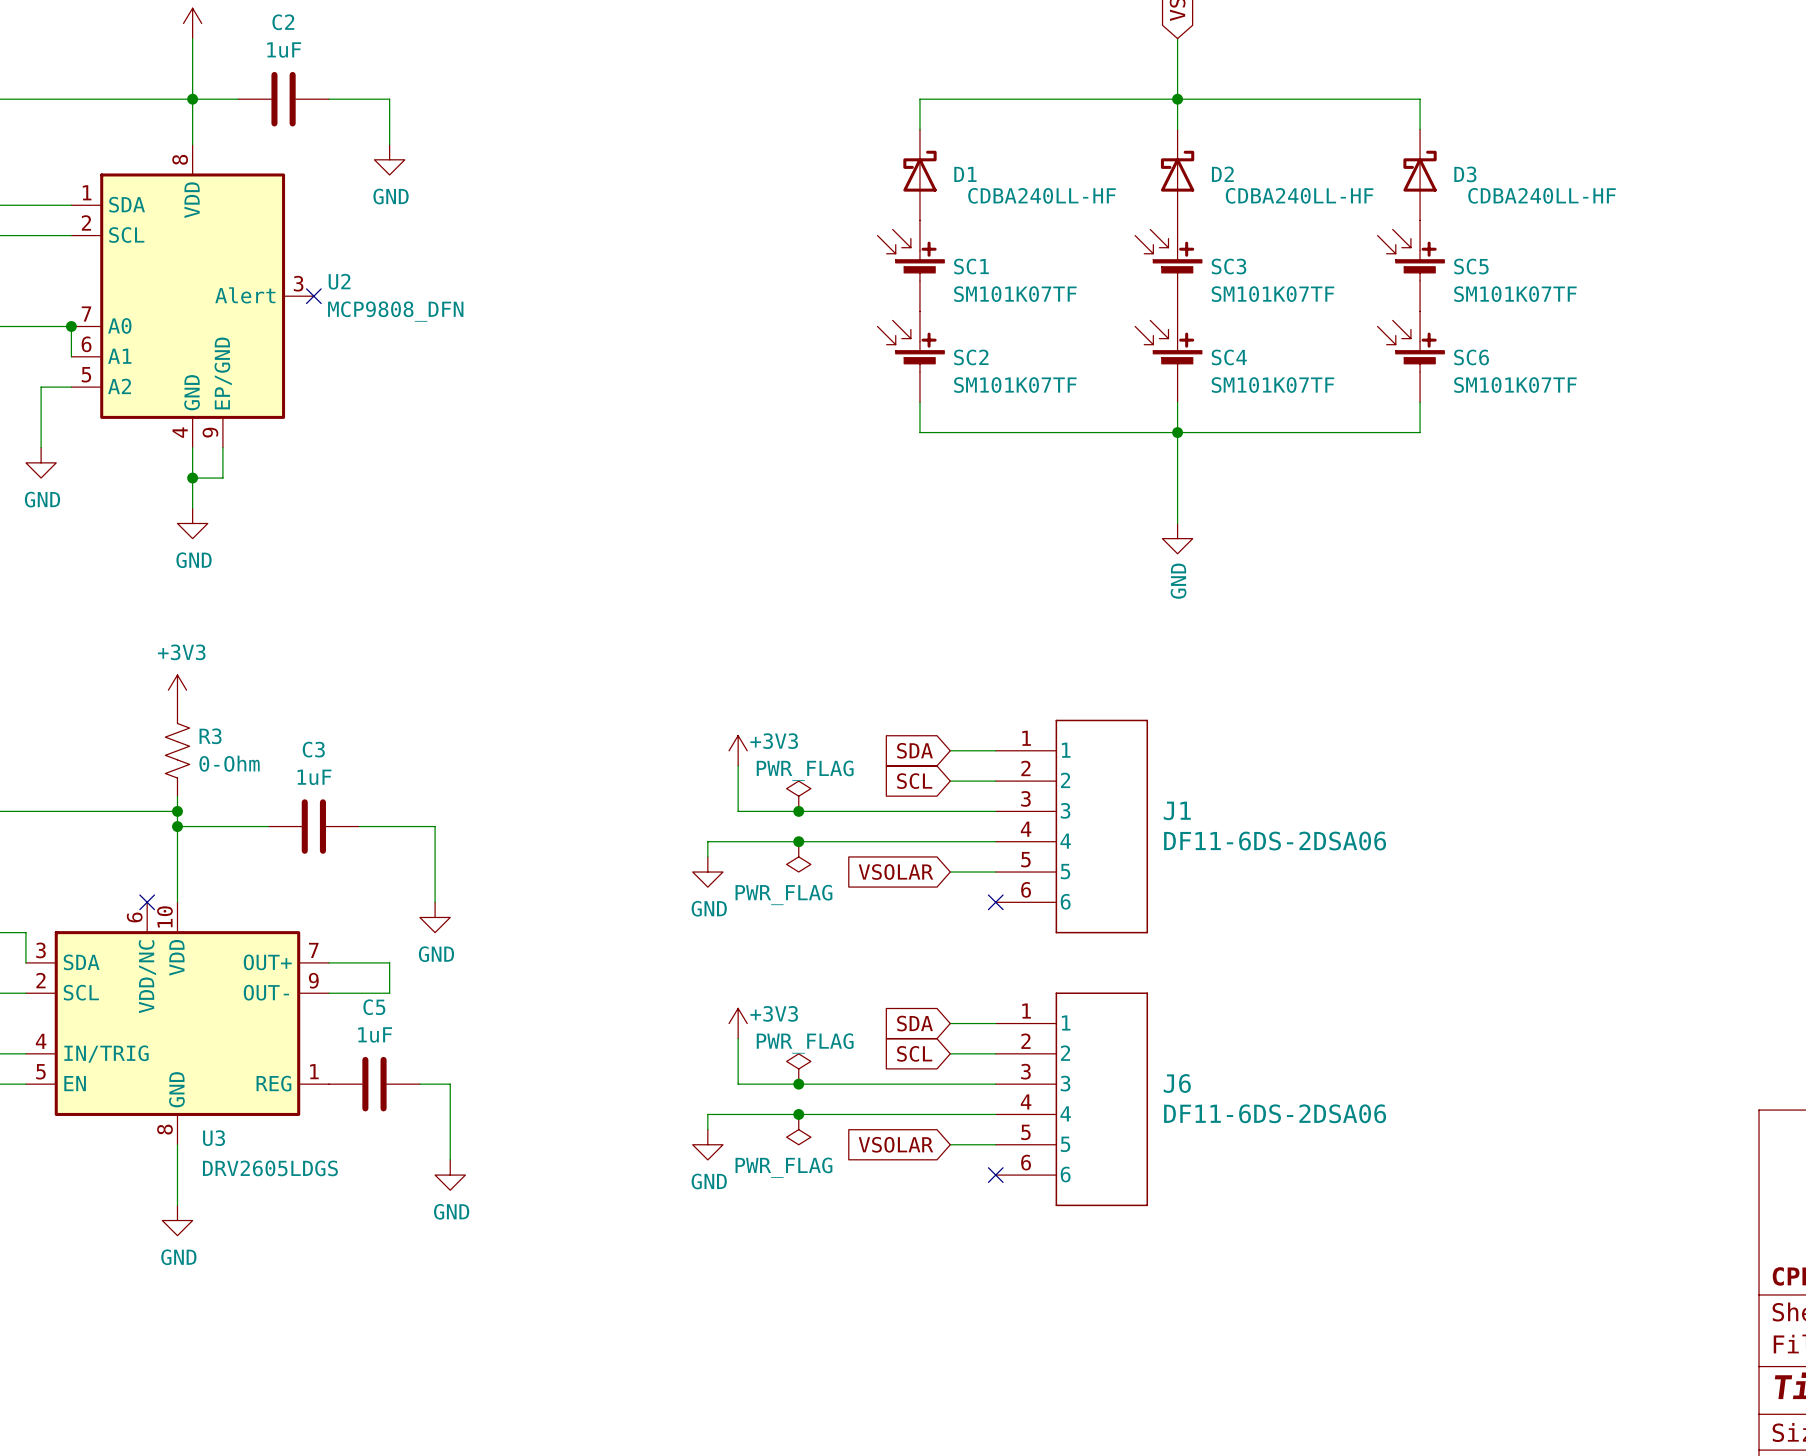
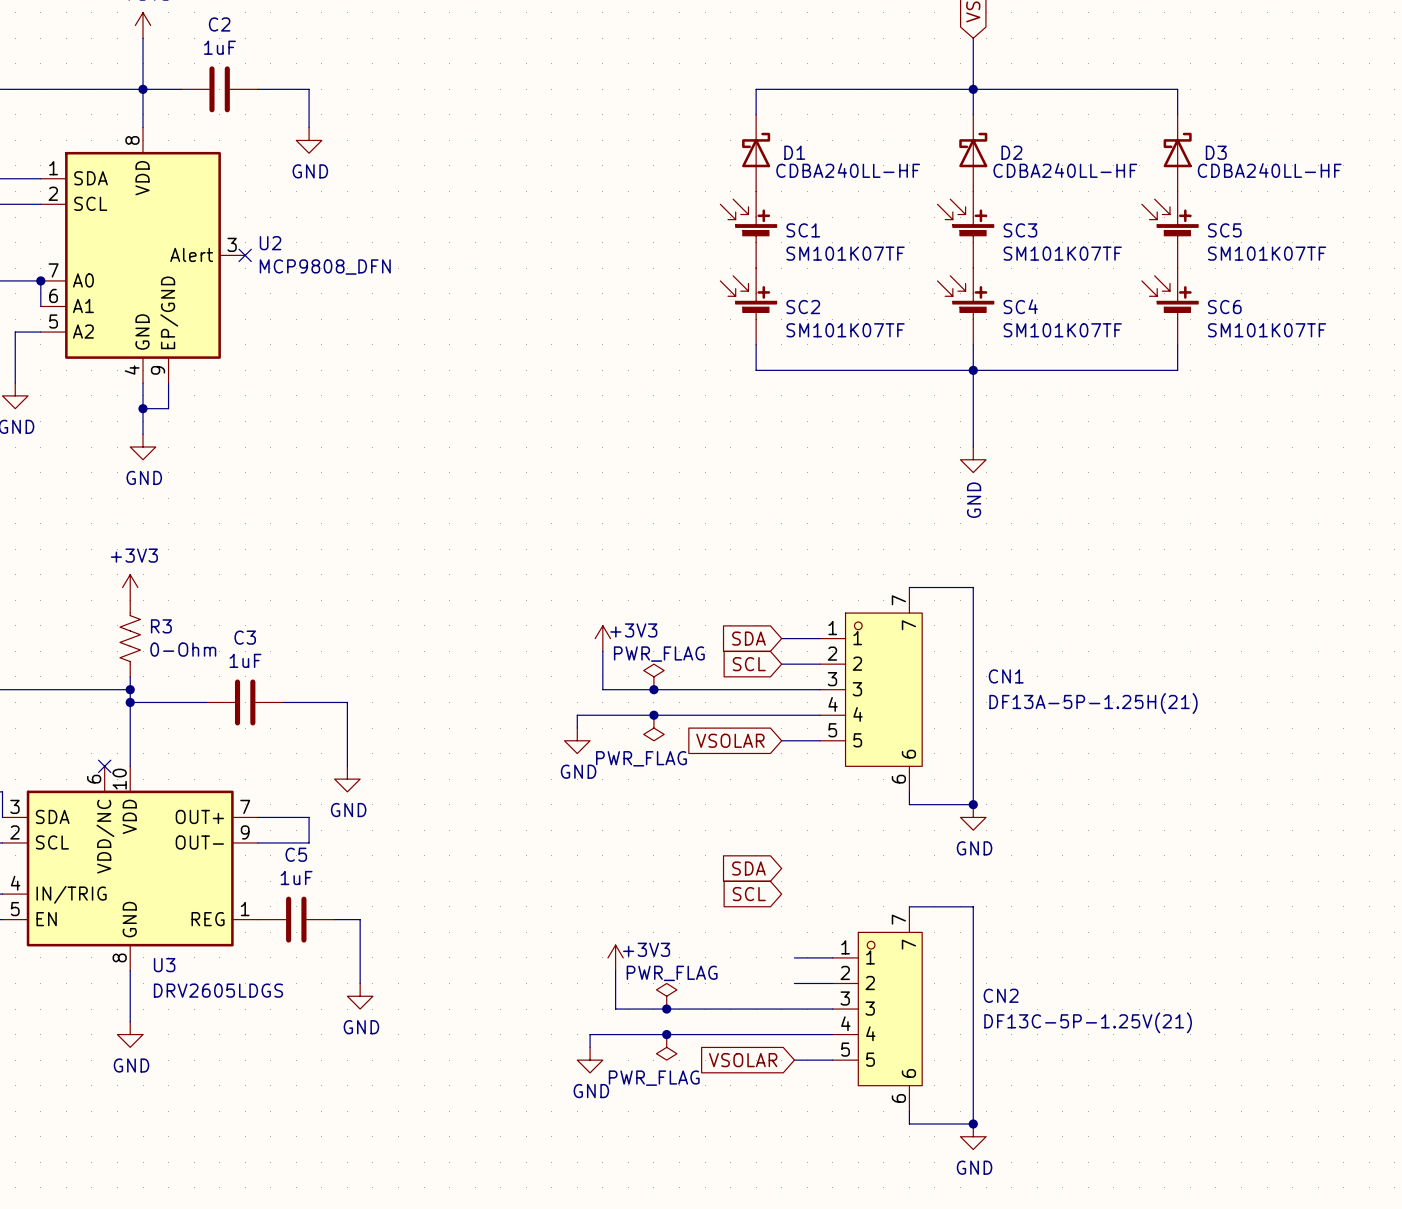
wire: none -> (909, 587) (973, 587) (973, 804) (909, 804) (909, 791)
CN1: none -> DF13A-5P-1.25H(21) (871, 689)
J1: DF11-6DS-2DSA06 (1071, 826) -> none
no-connect mark: (995, 902) -> none
junction: none -> (973, 804)
power symbol: none -> GND (973, 817)
power symbol position: +3V3 (738, 1023) -> +3V3 (615, 957)
wire: (950, 1023) (995, 1023) -> (794, 957) (832, 957)
wire: (738, 1038) (738, 1084) (995, 1084) -> (615, 970) (615, 1009) (832, 1009)
wire: (950, 1053) (995, 1053) -> (794, 983) (832, 983)
power symbol: PWR_FLAG (798, 1069) -> none
wire: none -> (909, 906) (973, 906) (973, 1123) (909, 1123) (909, 1111)
junction: (798, 1084) -> none
J6: DF11-6DS-2DSA06 (1071, 1099) -> none
junction: (798, 1114) -> none
wire: (995, 1114) (707, 1114) (707, 1129) -> (832, 1034) (590, 1034) (590, 1047)
power symbol rotation: 0° (798, 1129) -> 180° (666, 996)
power symbol position: PWR_FLAG (798, 1129) -> PWR_FLAG (666, 996)
power symbol position: GND (707, 1144) -> GND (590, 1060)
global label position: VSOLAR (895, 1144) -> VSOLAR (743, 1060)
wire: (950, 1144) (995, 1144) -> (794, 1060) (832, 1060)
no-connect mark: (995, 1175) -> none
junction: none -> (666, 1009)
CN2: none -> DF13C-5P-1.25V(21) (877, 1009)
junction: none -> (666, 1034)
power symbol: none -> PWR_FLAG (666, 1047)
junction: none -> (973, 1123)
power symbol: none -> GND (973, 1136)

